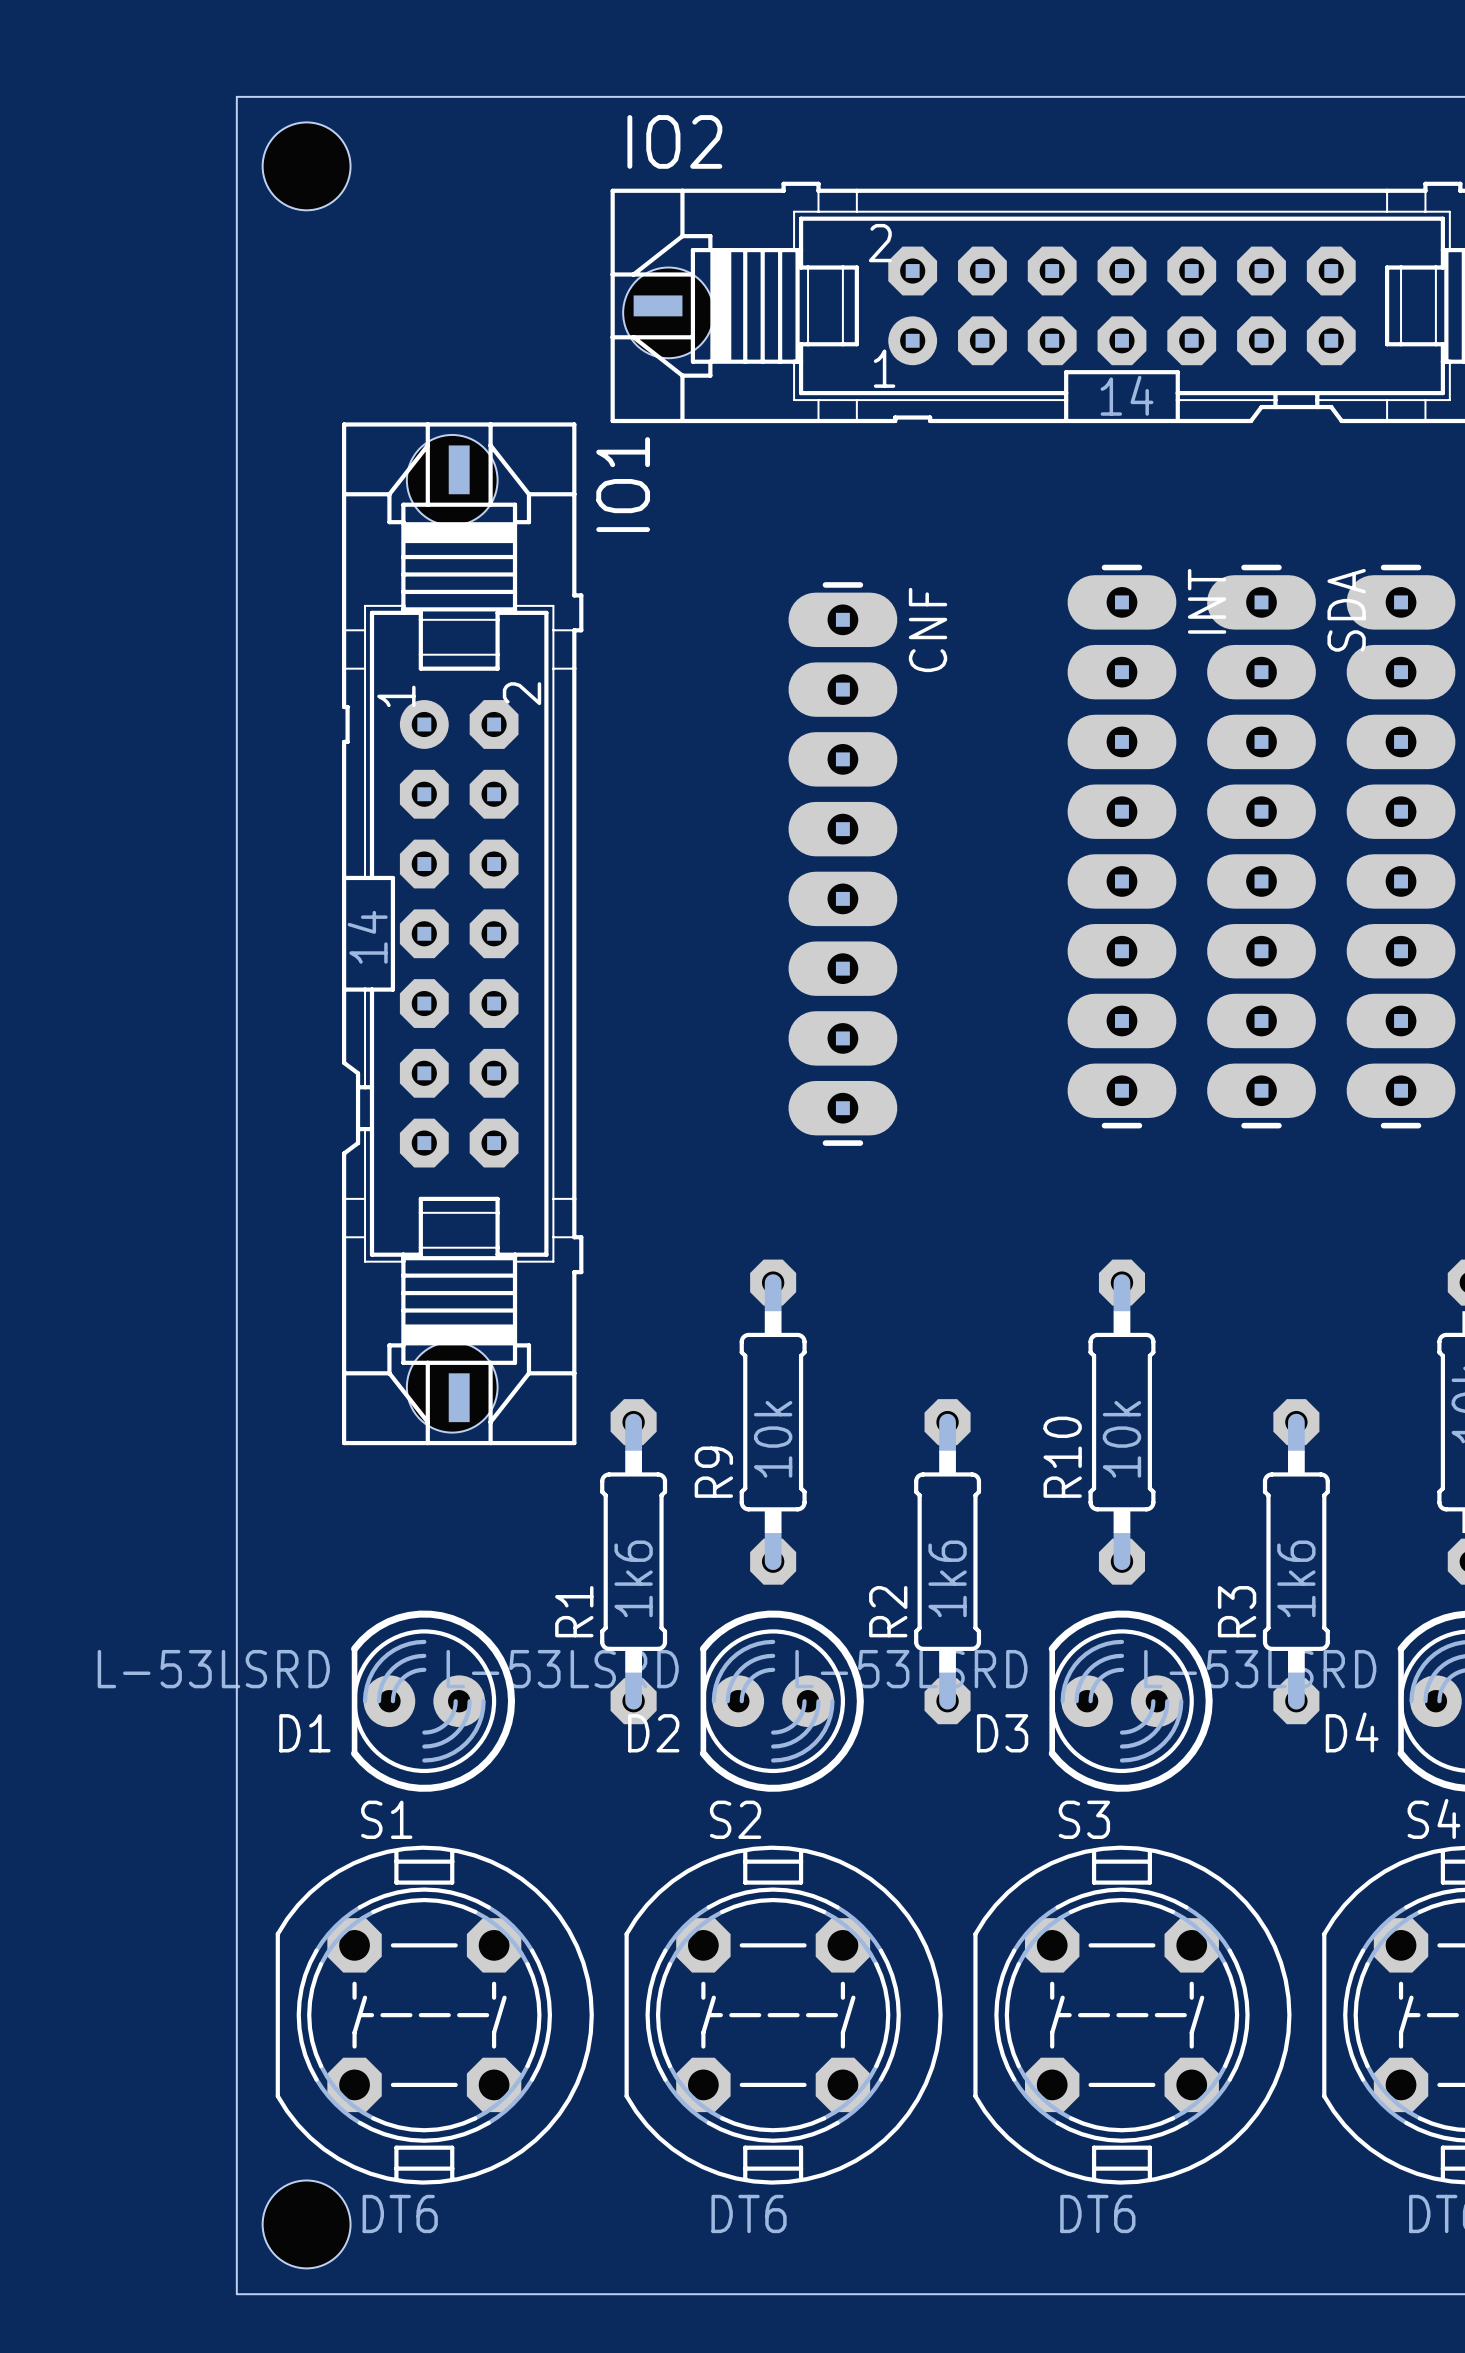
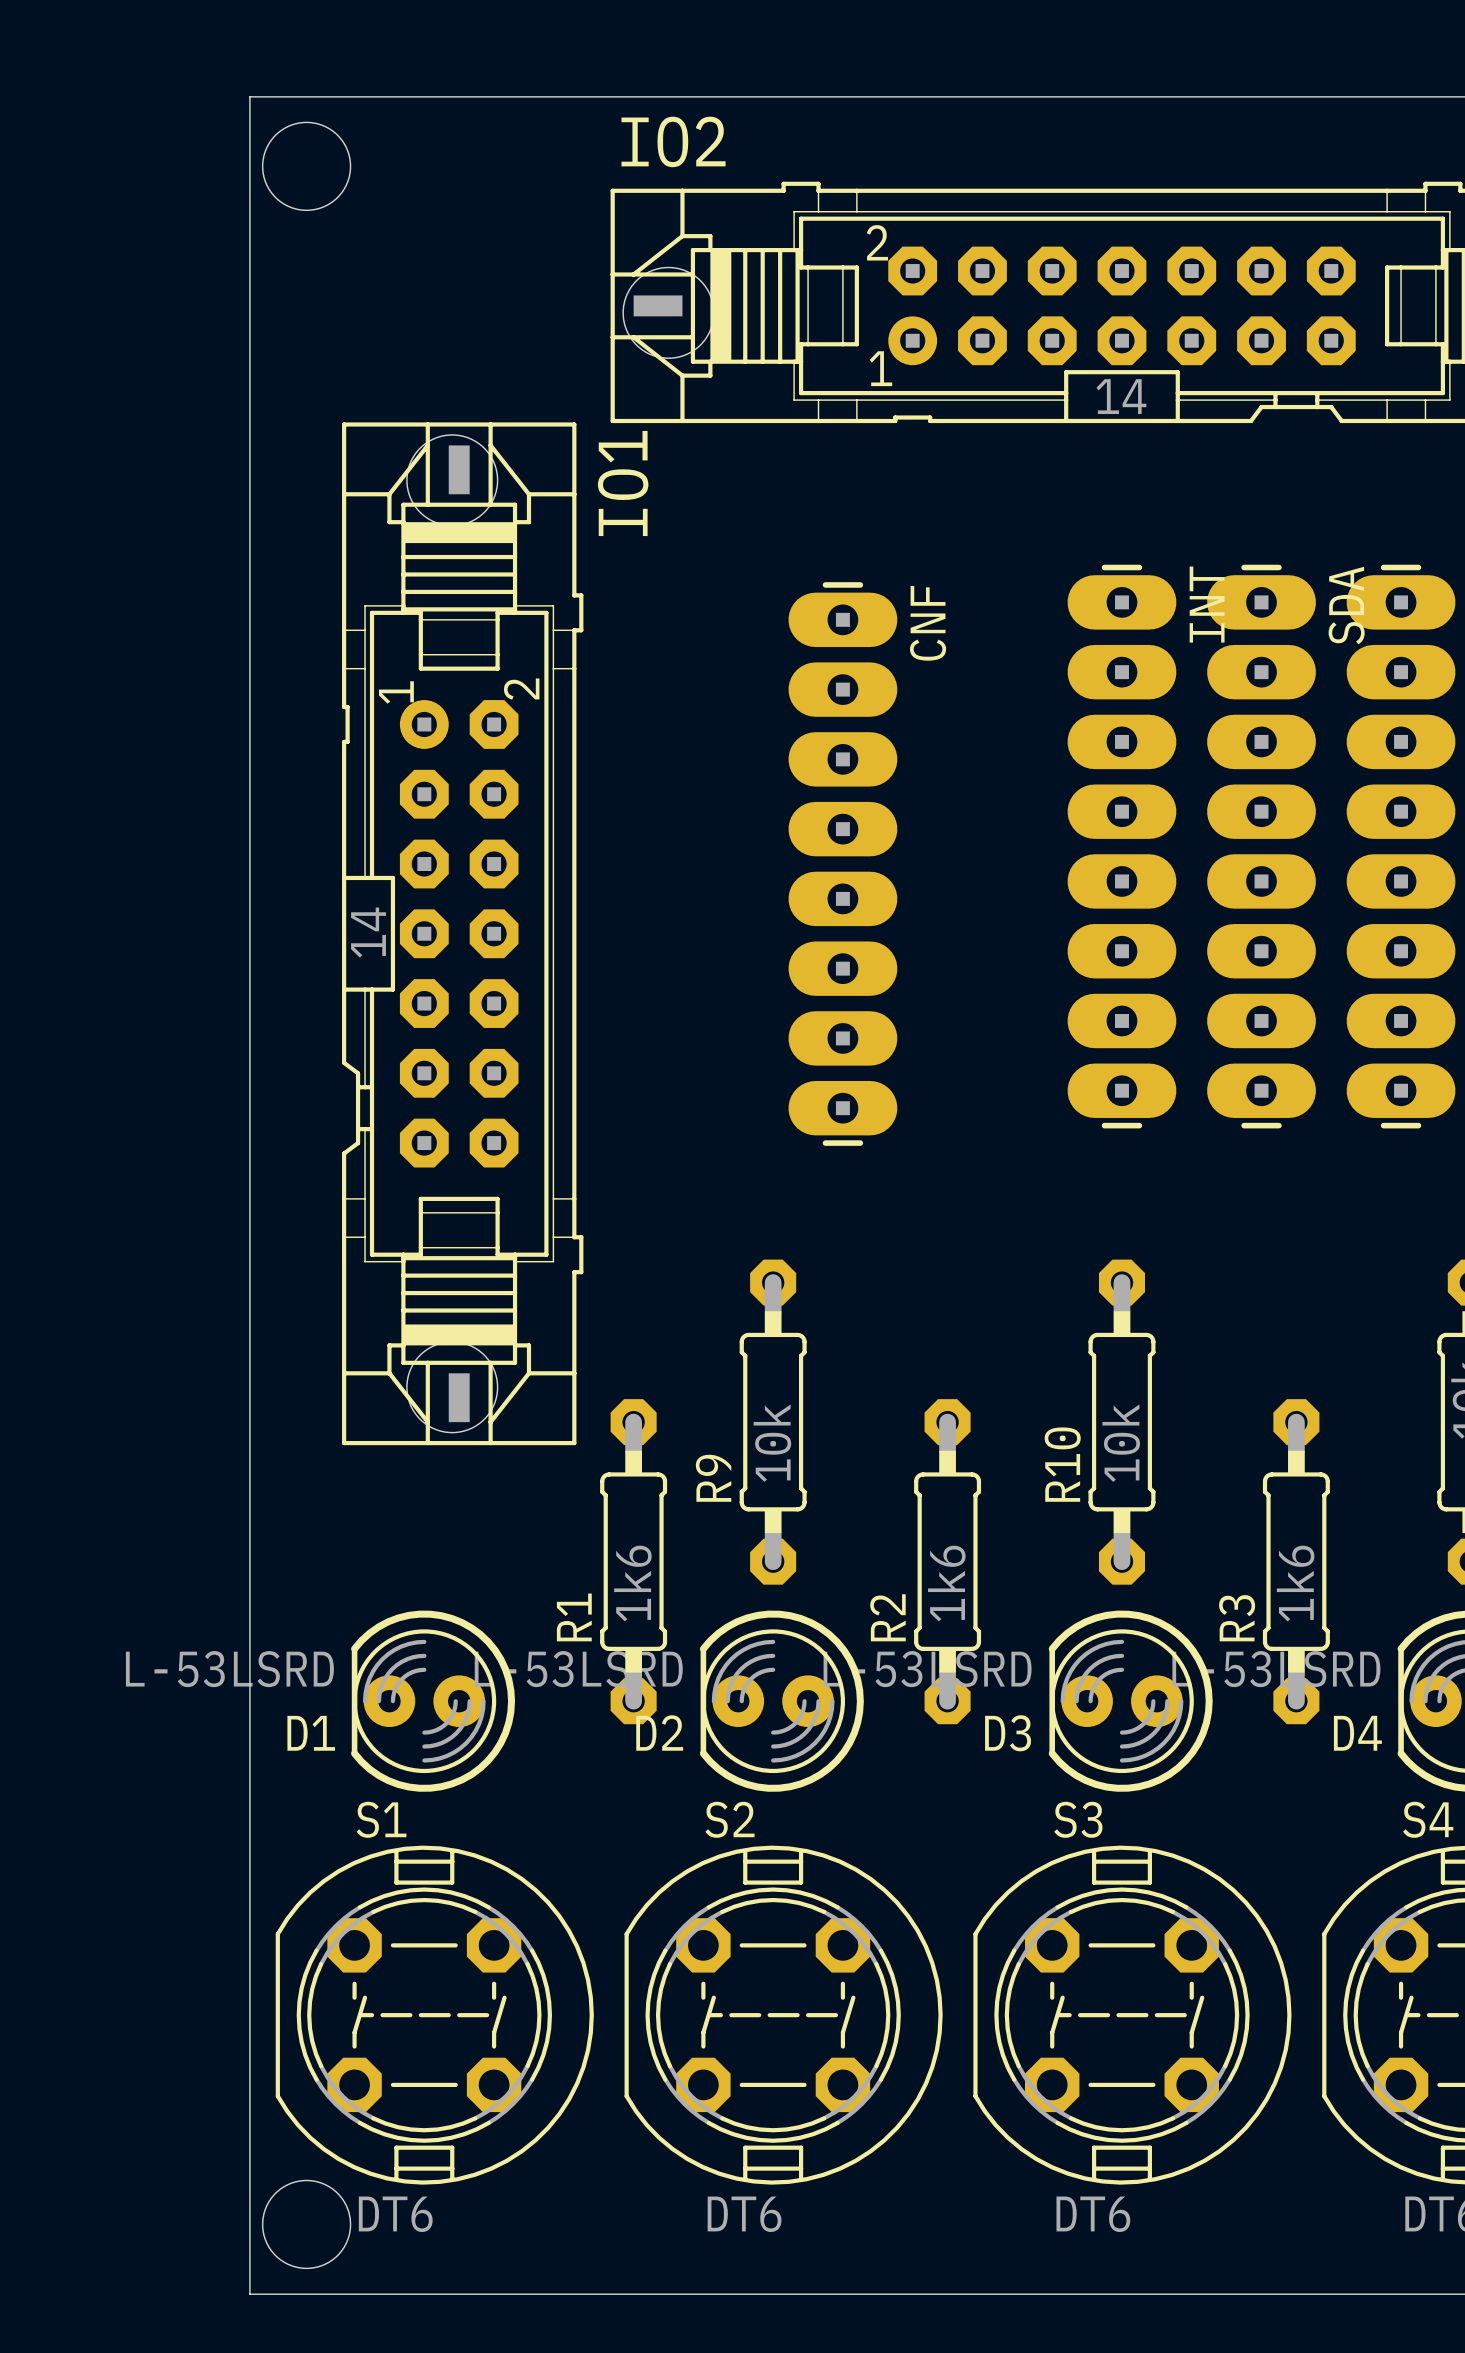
board edge: (249, 96) (236, 96) (236, 2294) (249, 2294) -> (249, 96) (249, 2294)

